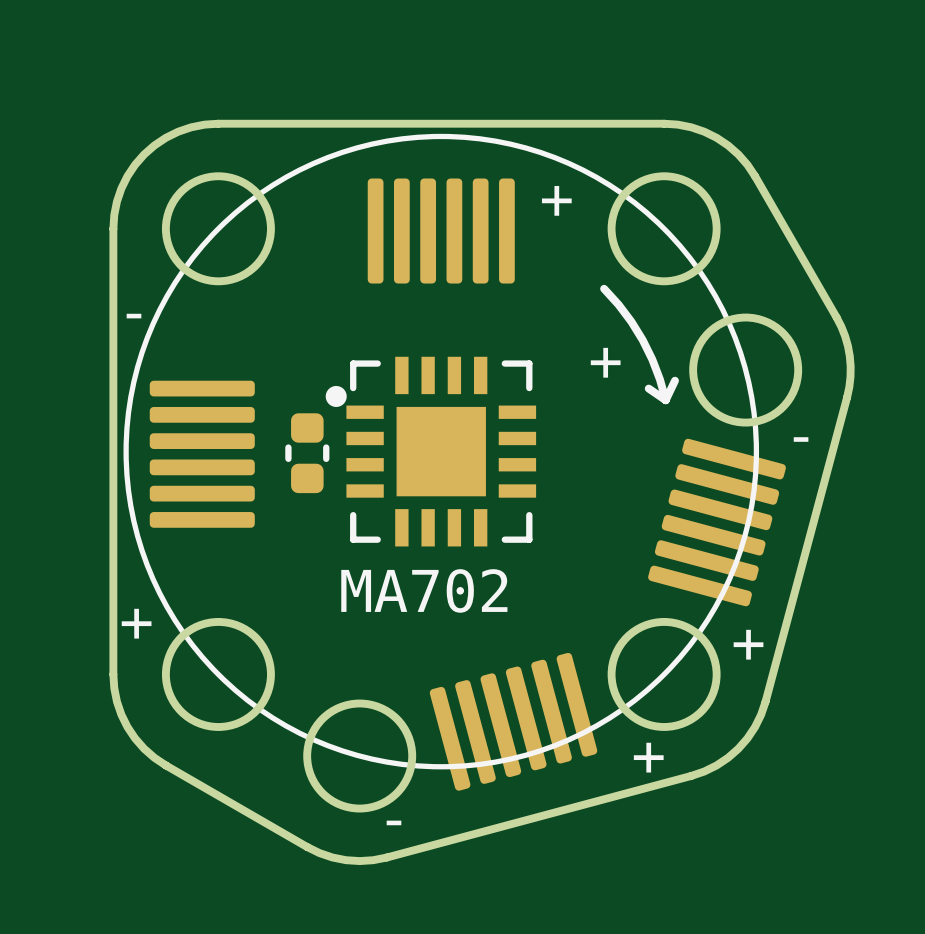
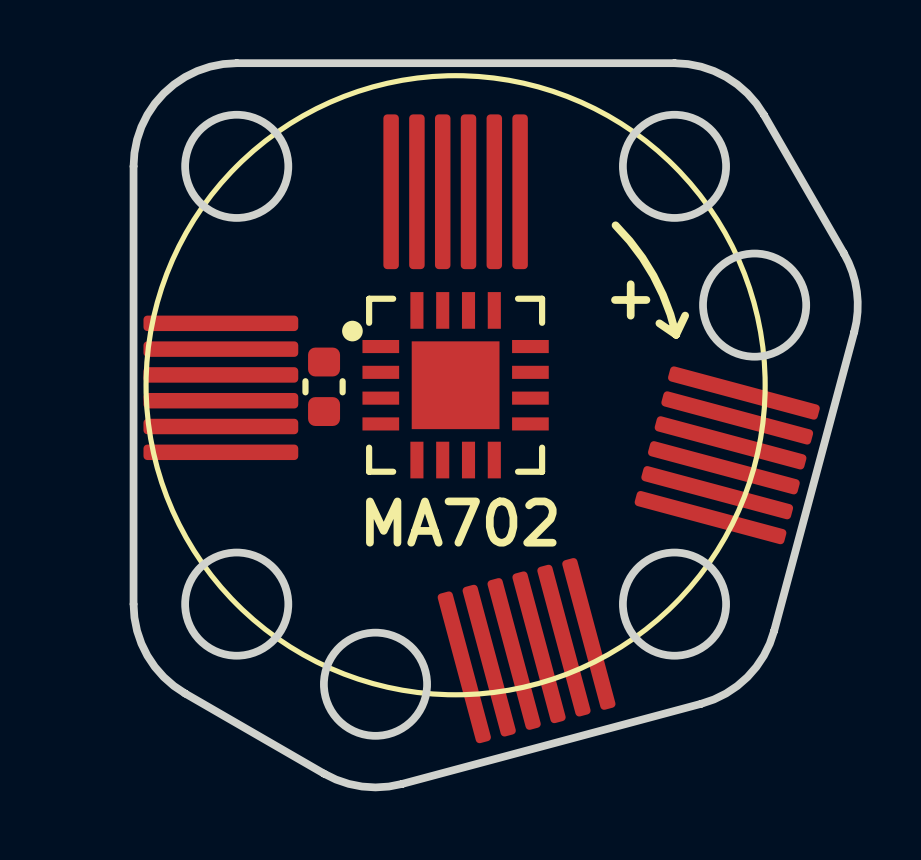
part footprint: [367, 178, 515, 284] -> [383, 114, 528, 270]
text: + (556, 200) -> none
text: - (134, 316) -> none
part footprint: [149, 380, 255, 528] -> [143, 315, 299, 461]
part footprint: [648, 438, 786, 607] -> [634, 366, 820, 545]
text: - (801, 439) -> none
text: + (136, 623) -> none
text: + (748, 644) -> none
part footprint: [429, 652, 598, 791] -> [437, 558, 616, 744]
text: + (648, 757) -> none
text: - (393, 822) -> none

